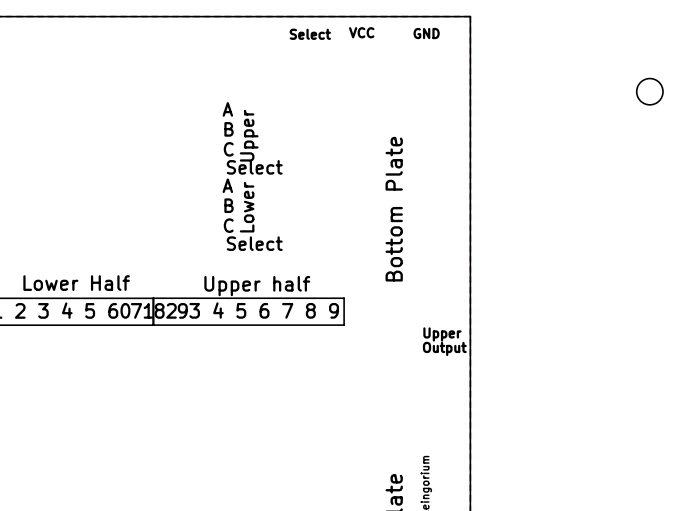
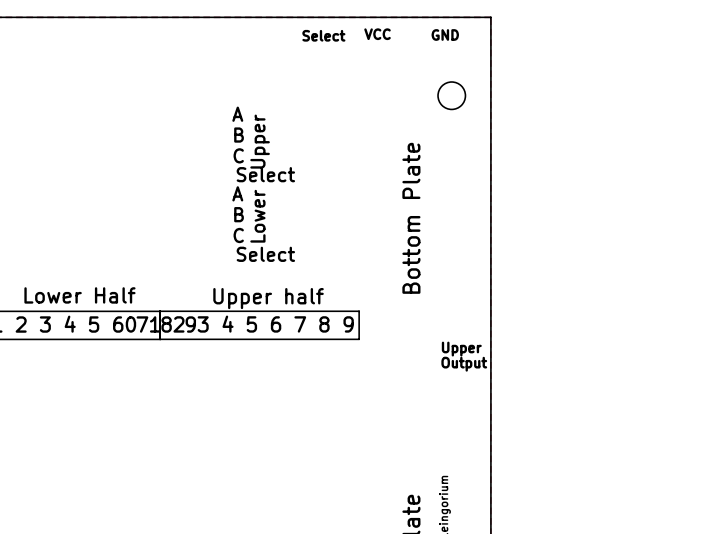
round board edge: none -> [437, 81, 466, 110]
round board edge: [636, 78, 664, 106] -> none

